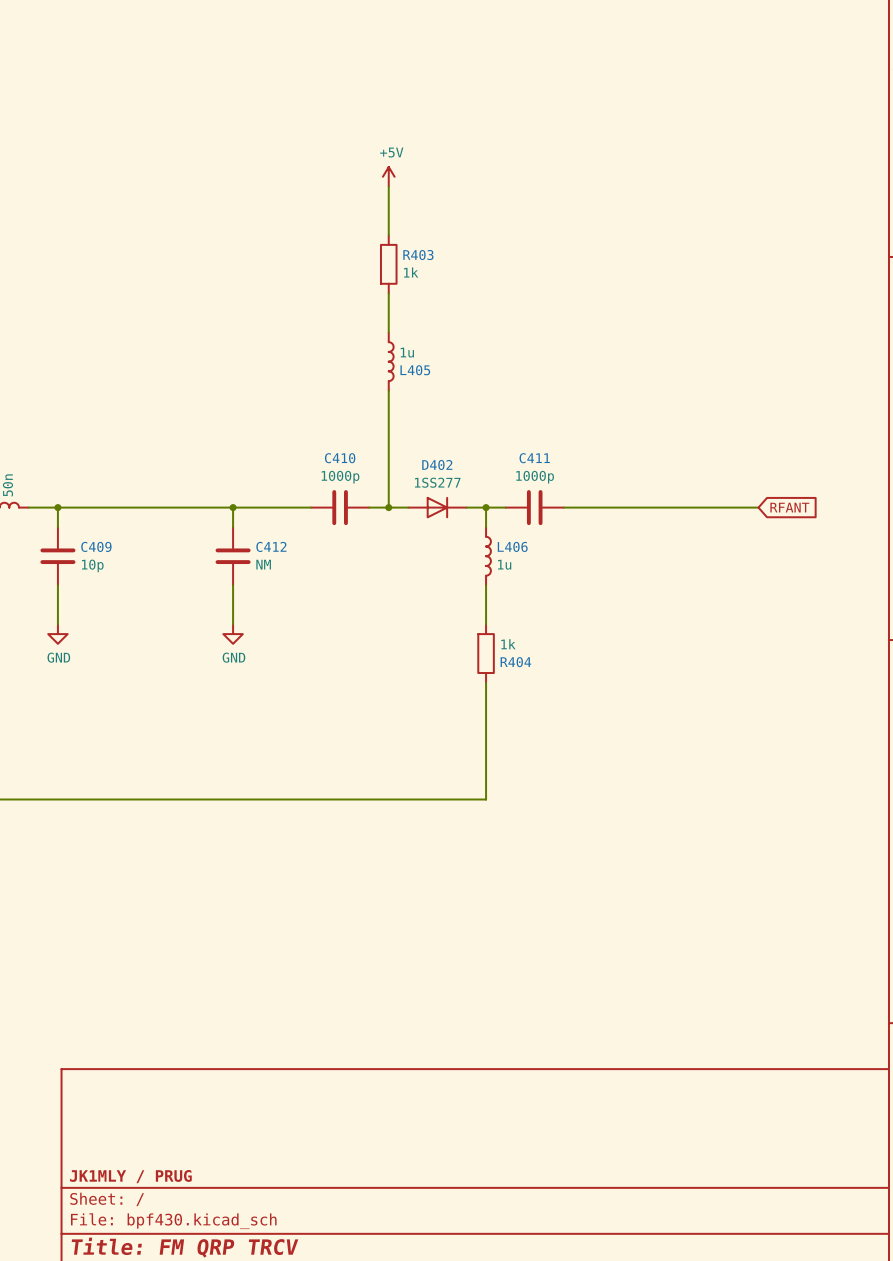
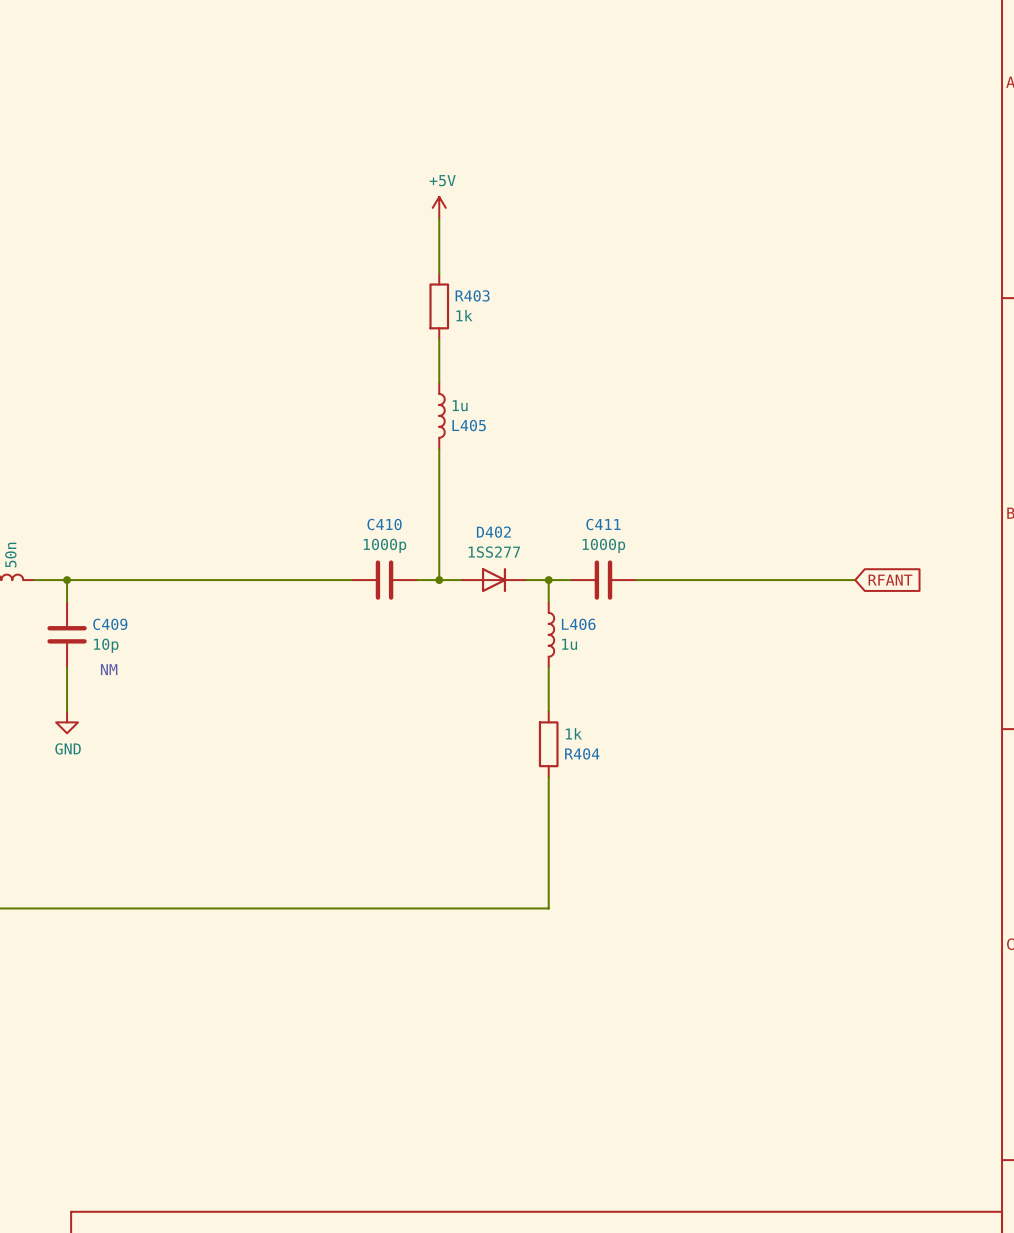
wire: (233, 507) (233, 527) -> none
junction: (233, 507) -> none
C412: NM (233, 556) -> none
wire: (233, 585) (233, 624) -> none
text: none -> NM (109, 669)
power symbol: GND (233, 634) -> none

